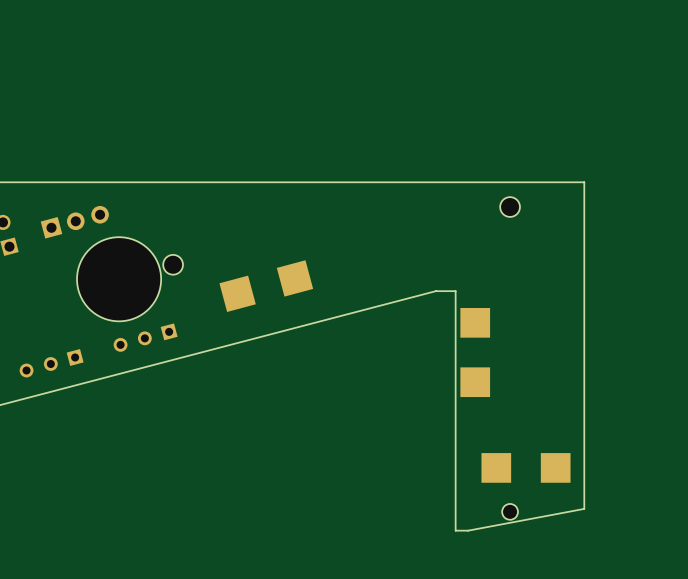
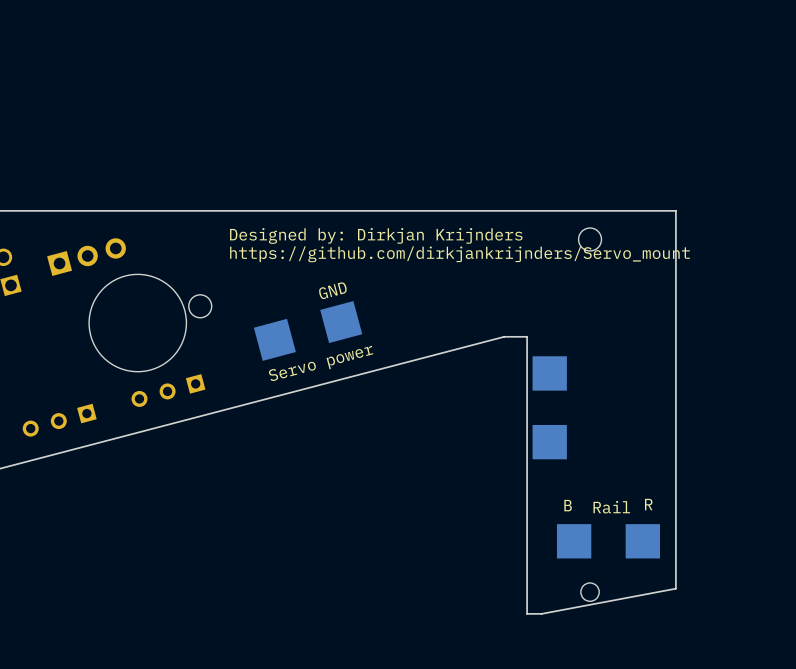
text: none -> Designed by: Dirkjan Krijnders (376, 235)
text: none -> https://github.com/dirkjankrijnders/Servo_mount (459, 254)
text: none -> GND (332, 290)
text: none -> Servo power (321, 363)
text: none -> R (648, 504)
text: none -> B (568, 505)
text: none -> Rail (611, 507)

